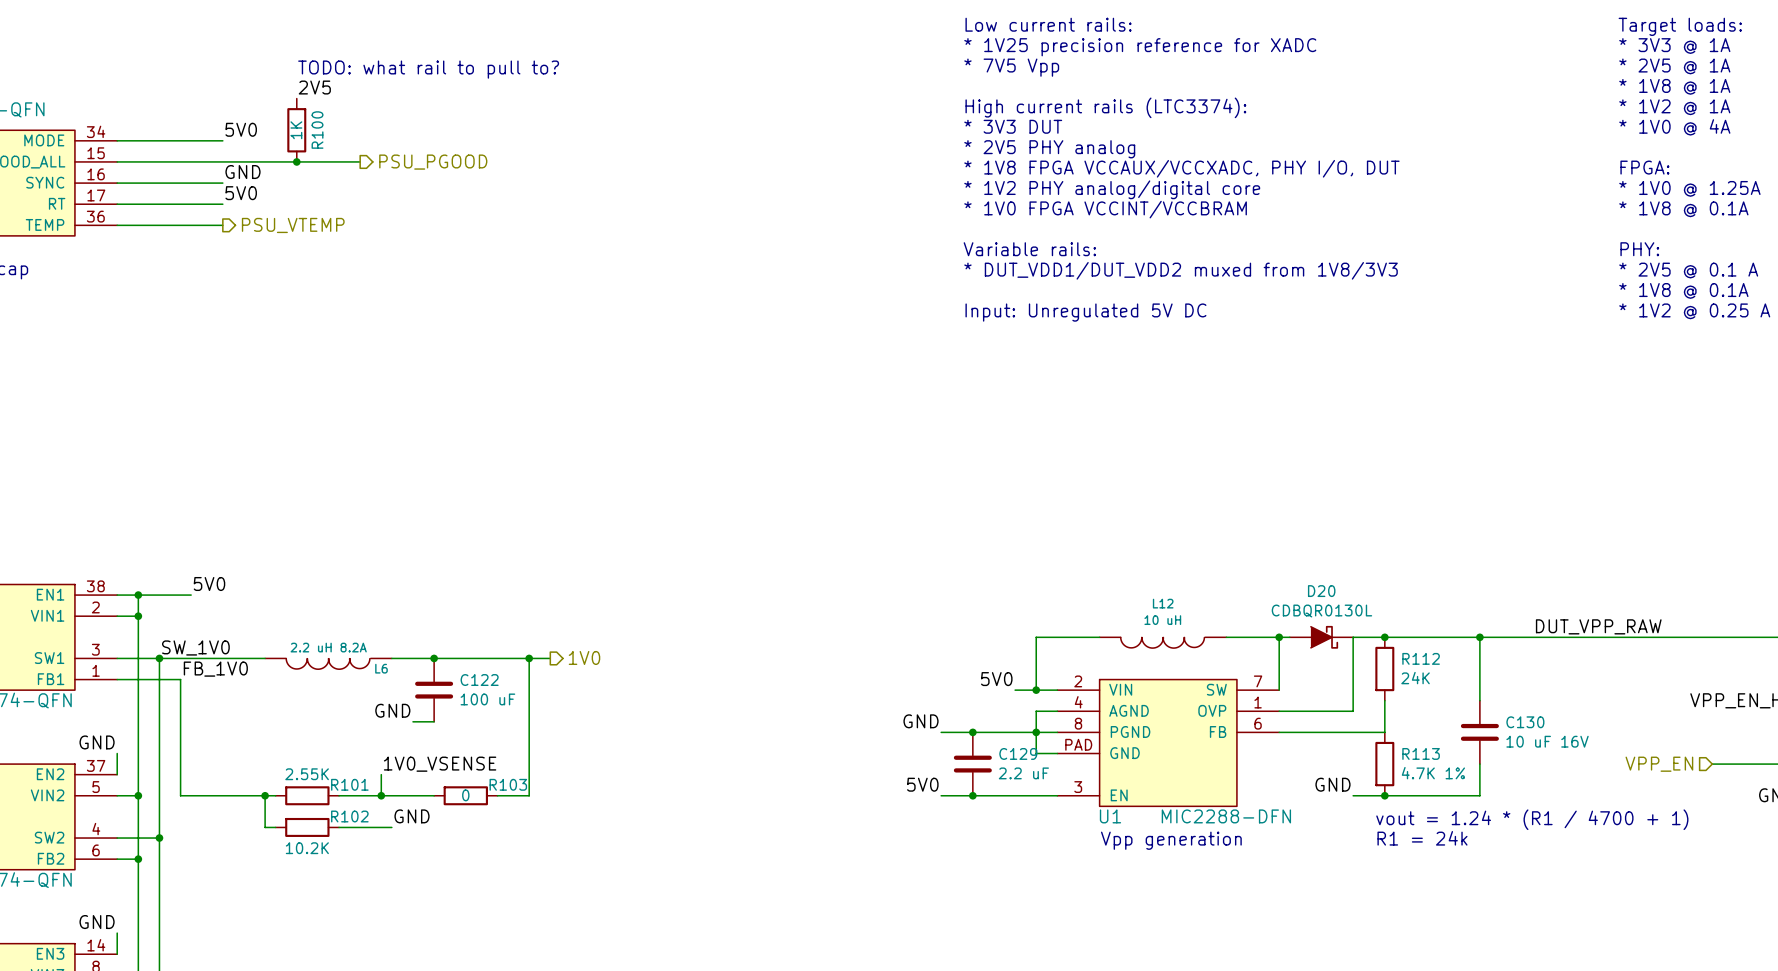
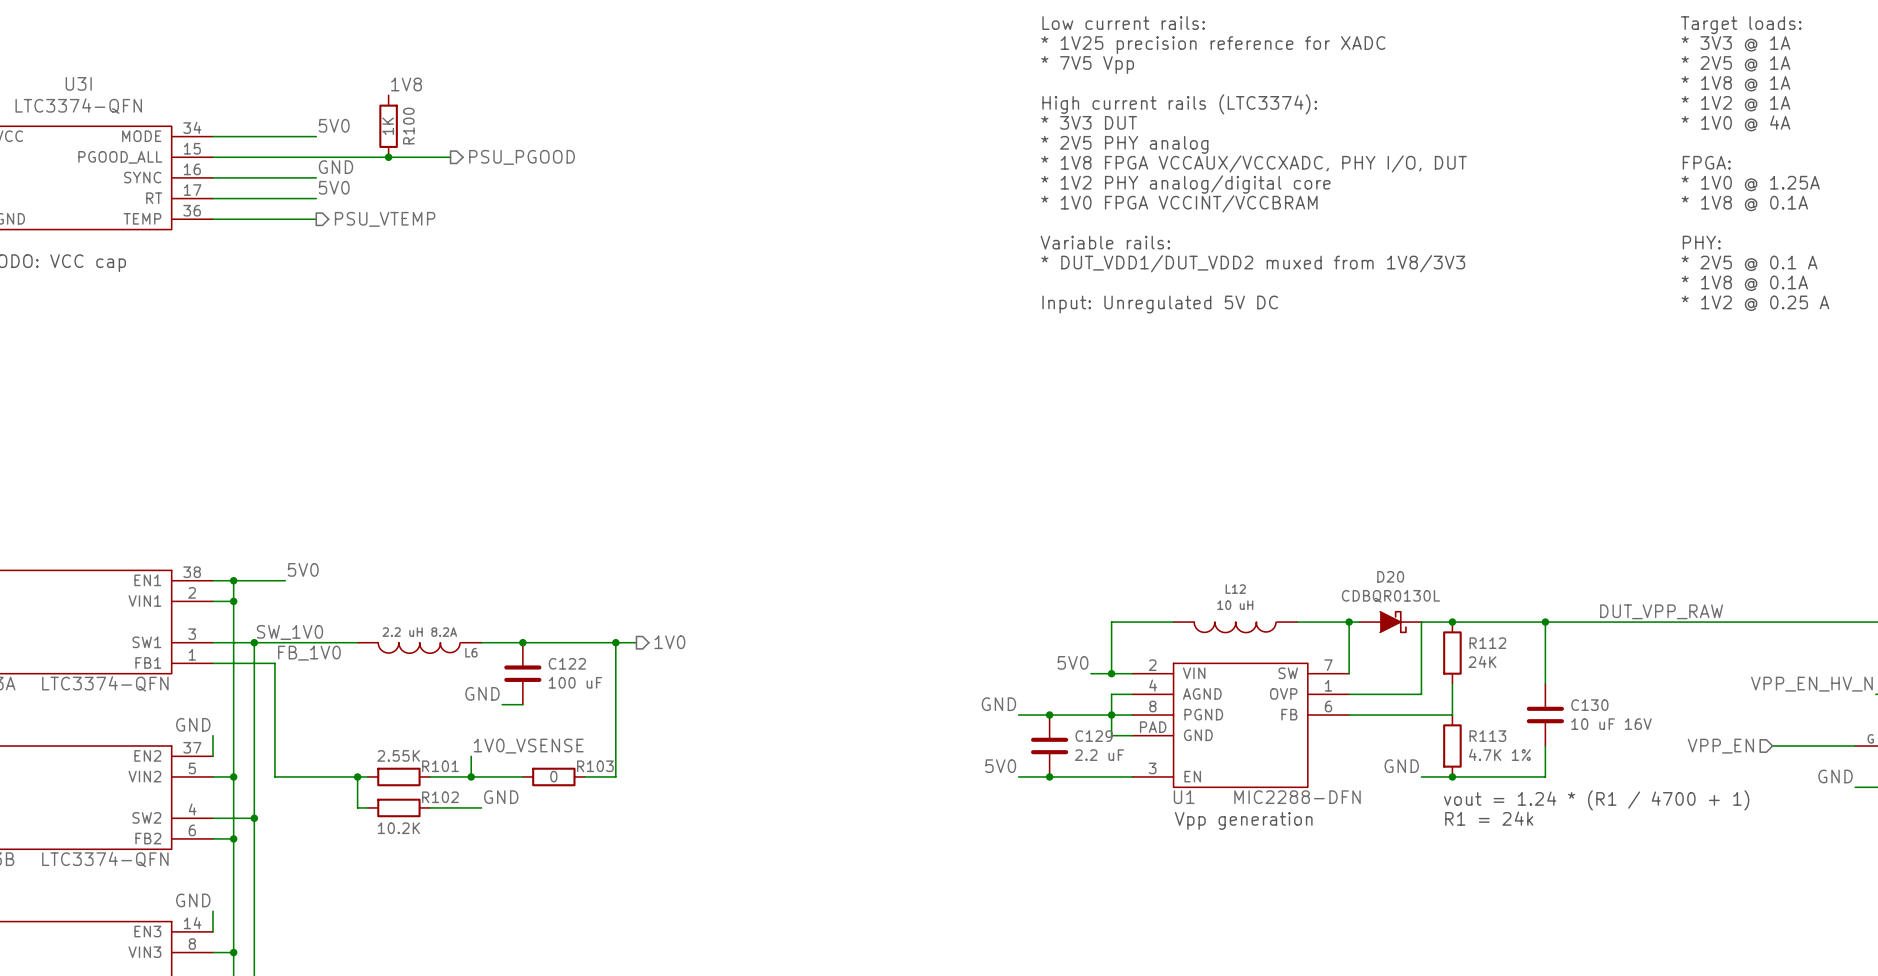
text: TODO: what rail to pull to? (428, 69) -> none
label: 2V5 (314, 87) -> 1V8 (406, 84)

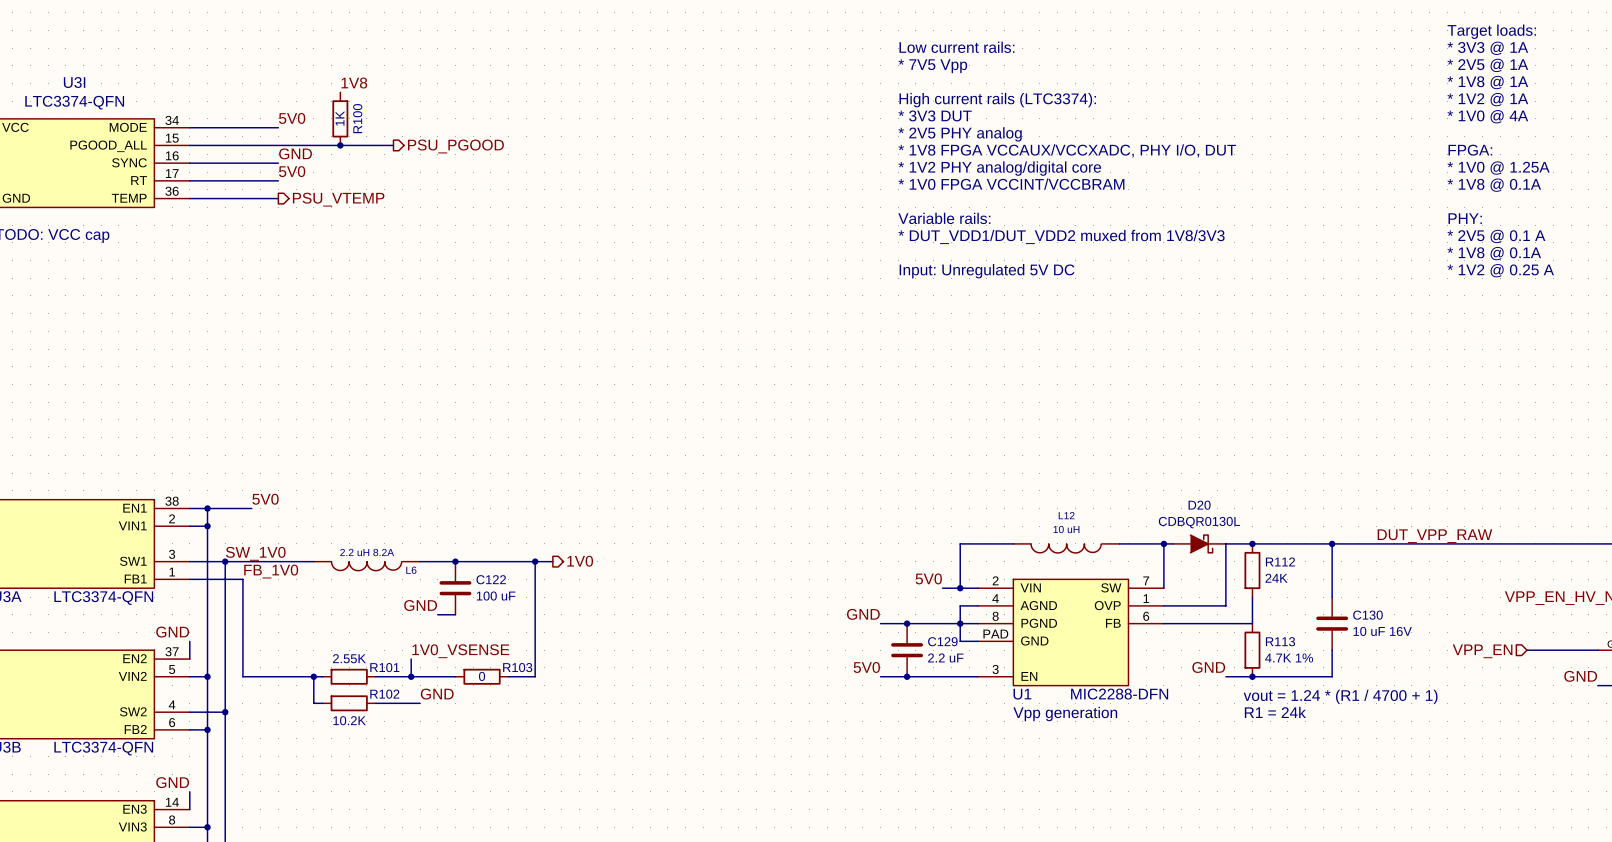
text: Low current rails: (1123, 23) -> none
text: * 1V25 precision reference for XADC (1213, 45) -> Low current rails: (956, 47)

